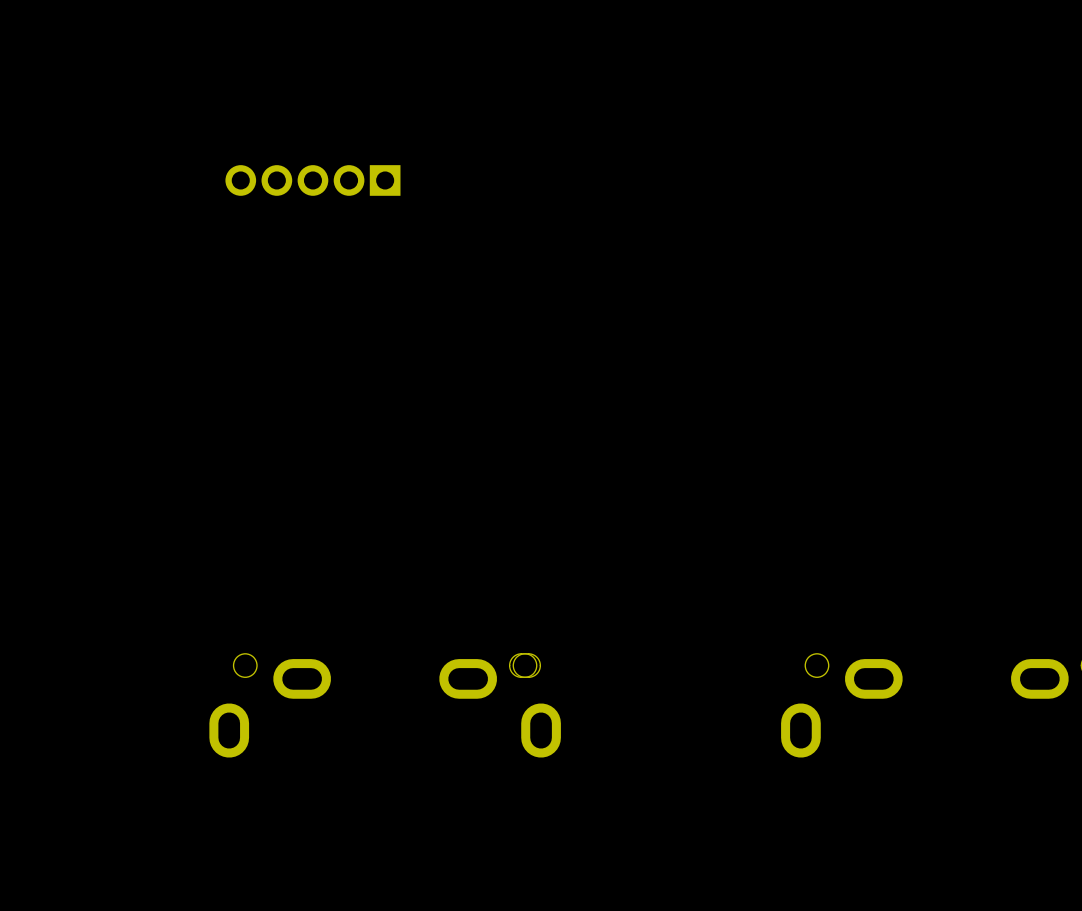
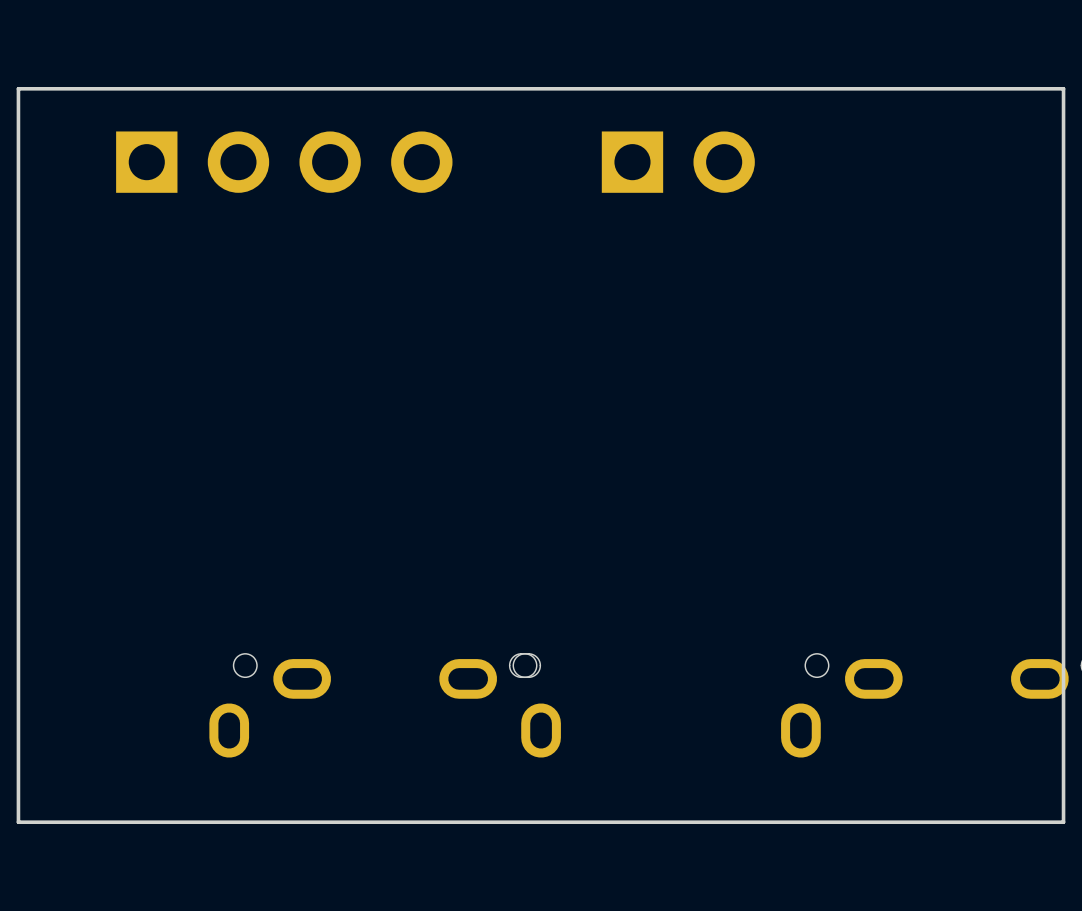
board edge: none -> (1063, 88) (18, 88) (18, 822) (1063, 822) (1063, 88)
part: none -> (678, 162)
part footprint: [225, 165, 401, 196] -> [116, 131, 453, 193]

